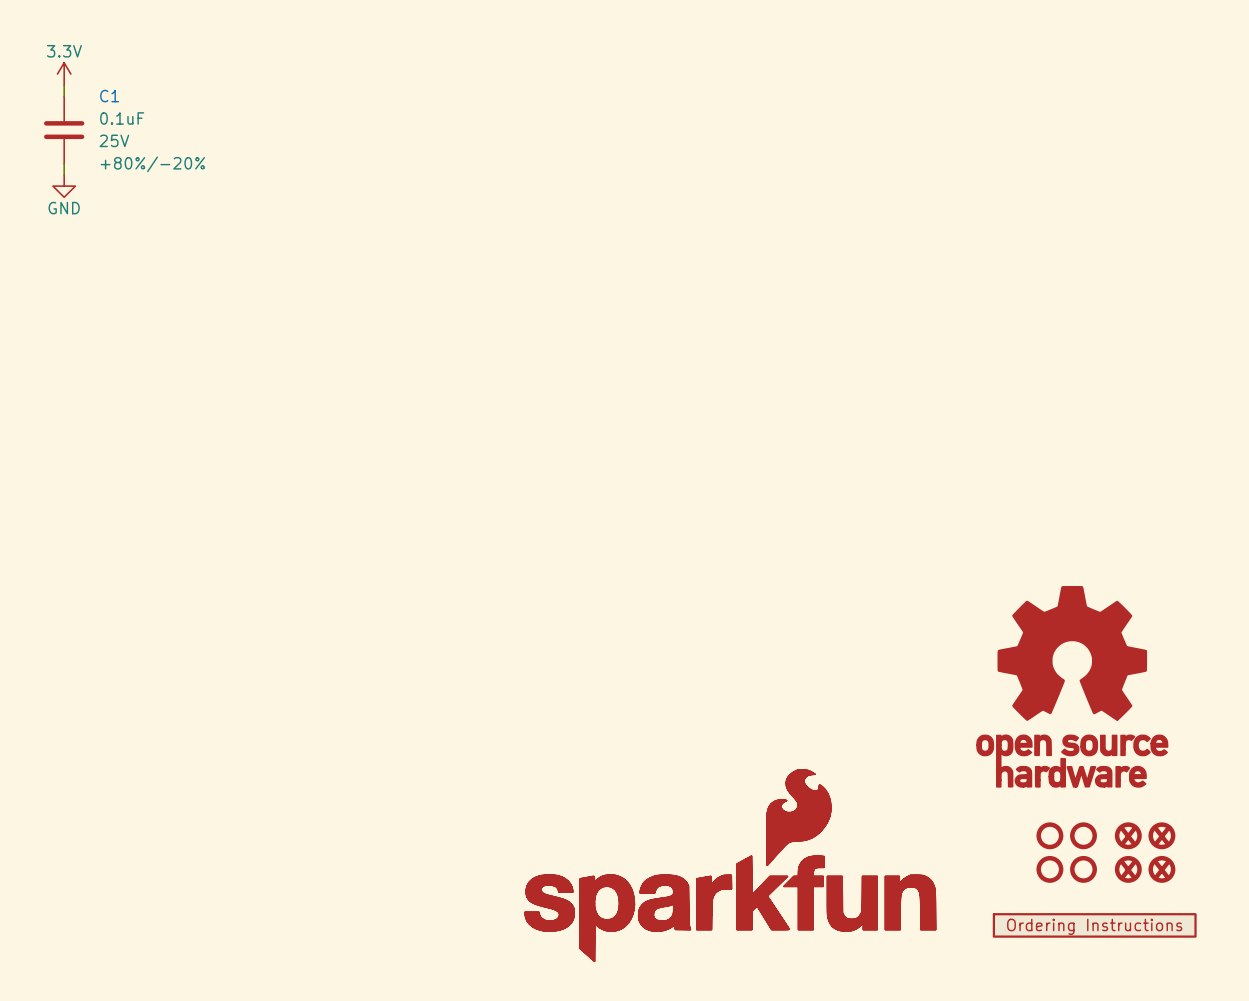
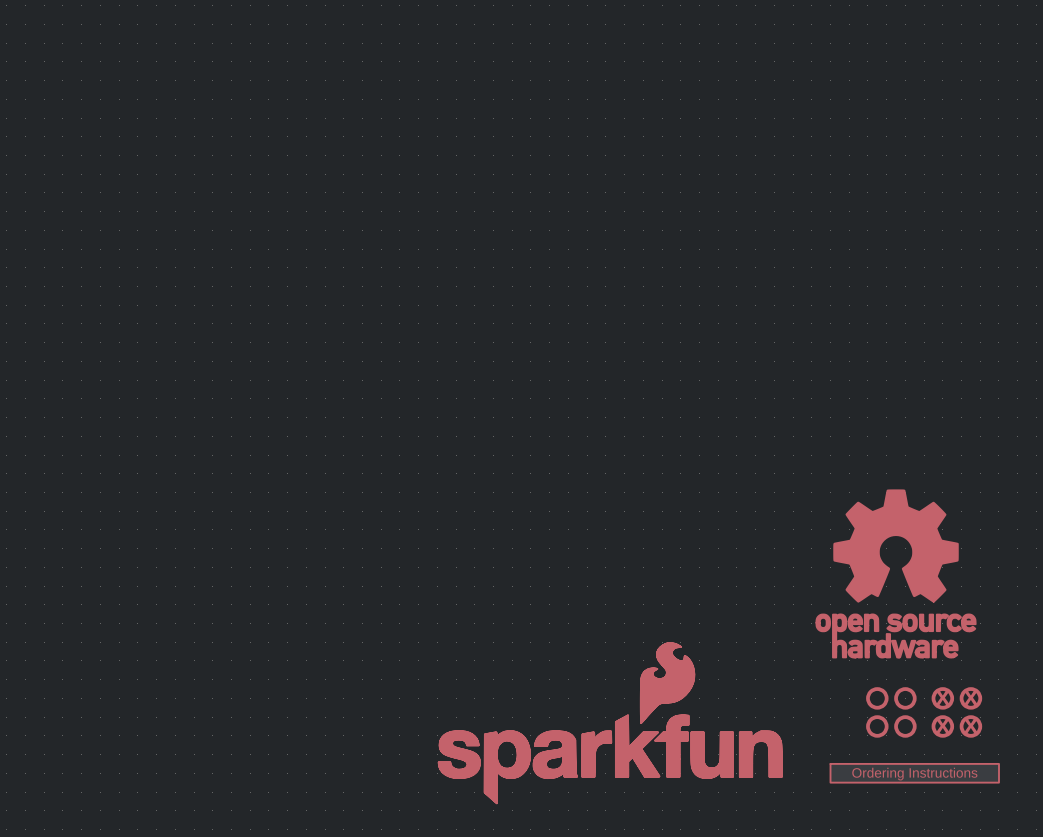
power symbol: 3.3V (64, 74) -> none
wire: (64, 85) (64, 96) -> none
C1: 0.1uF (64, 130) -> none
wire: (64, 163) (64, 174) -> none
power symbol: GND (64, 186) -> none

